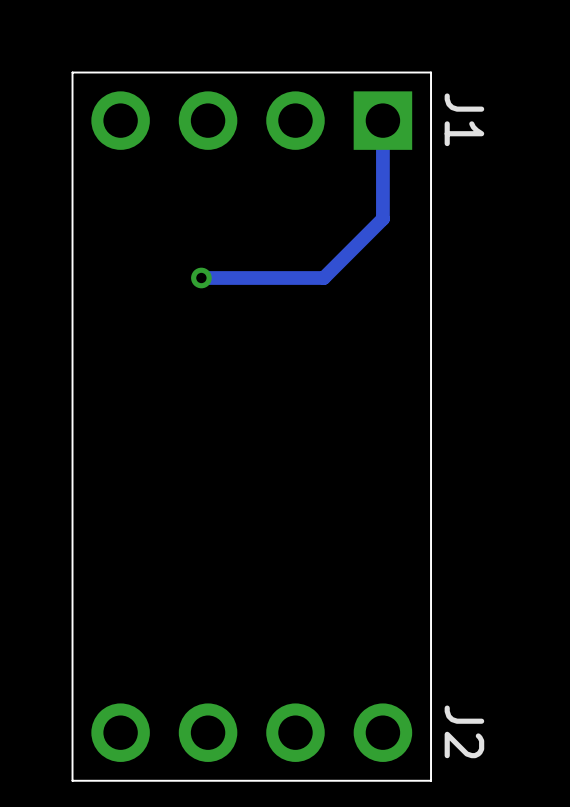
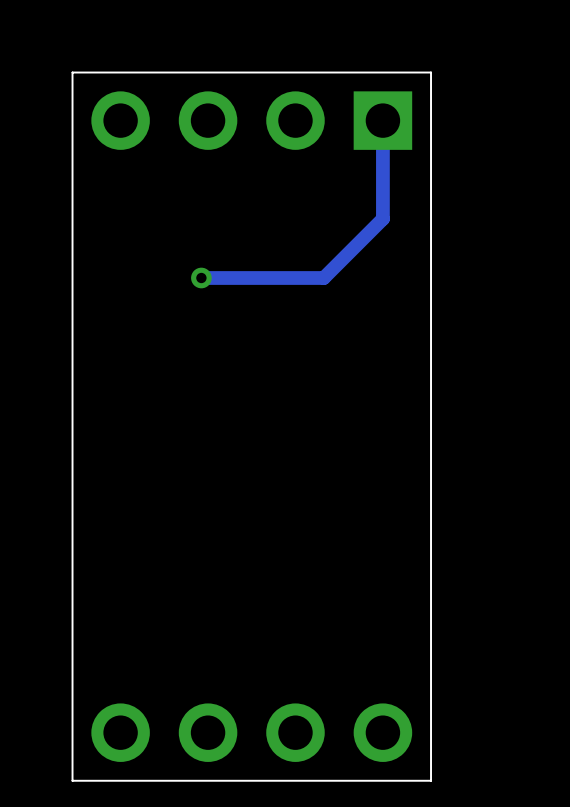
J1 name: J1 (464, 119) -> none
J2 name: J2 (464, 731) -> none

